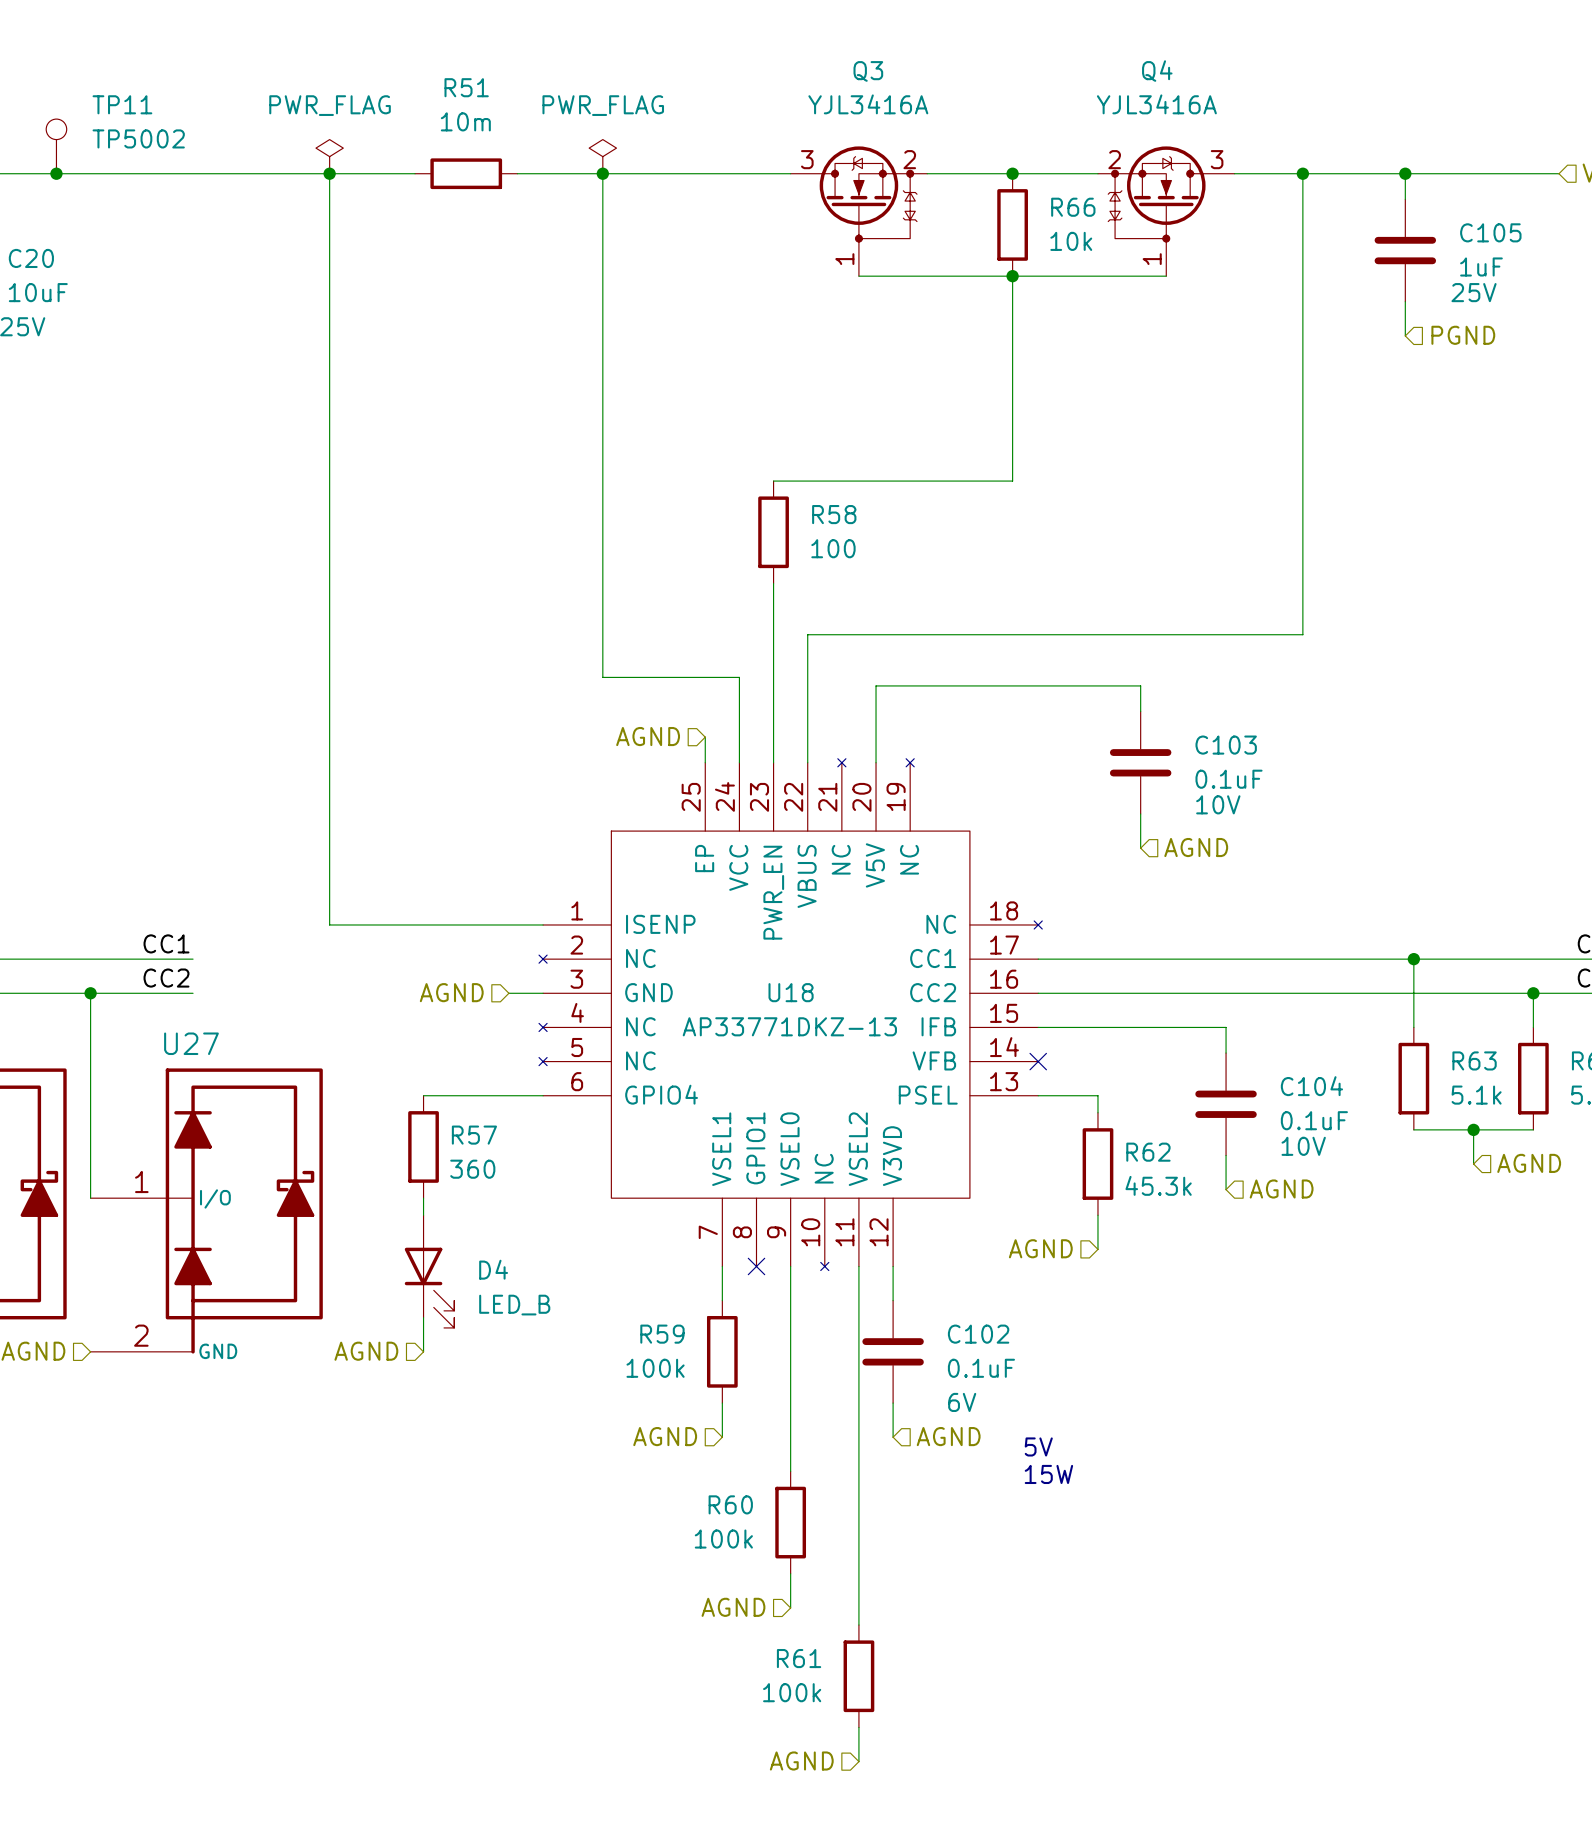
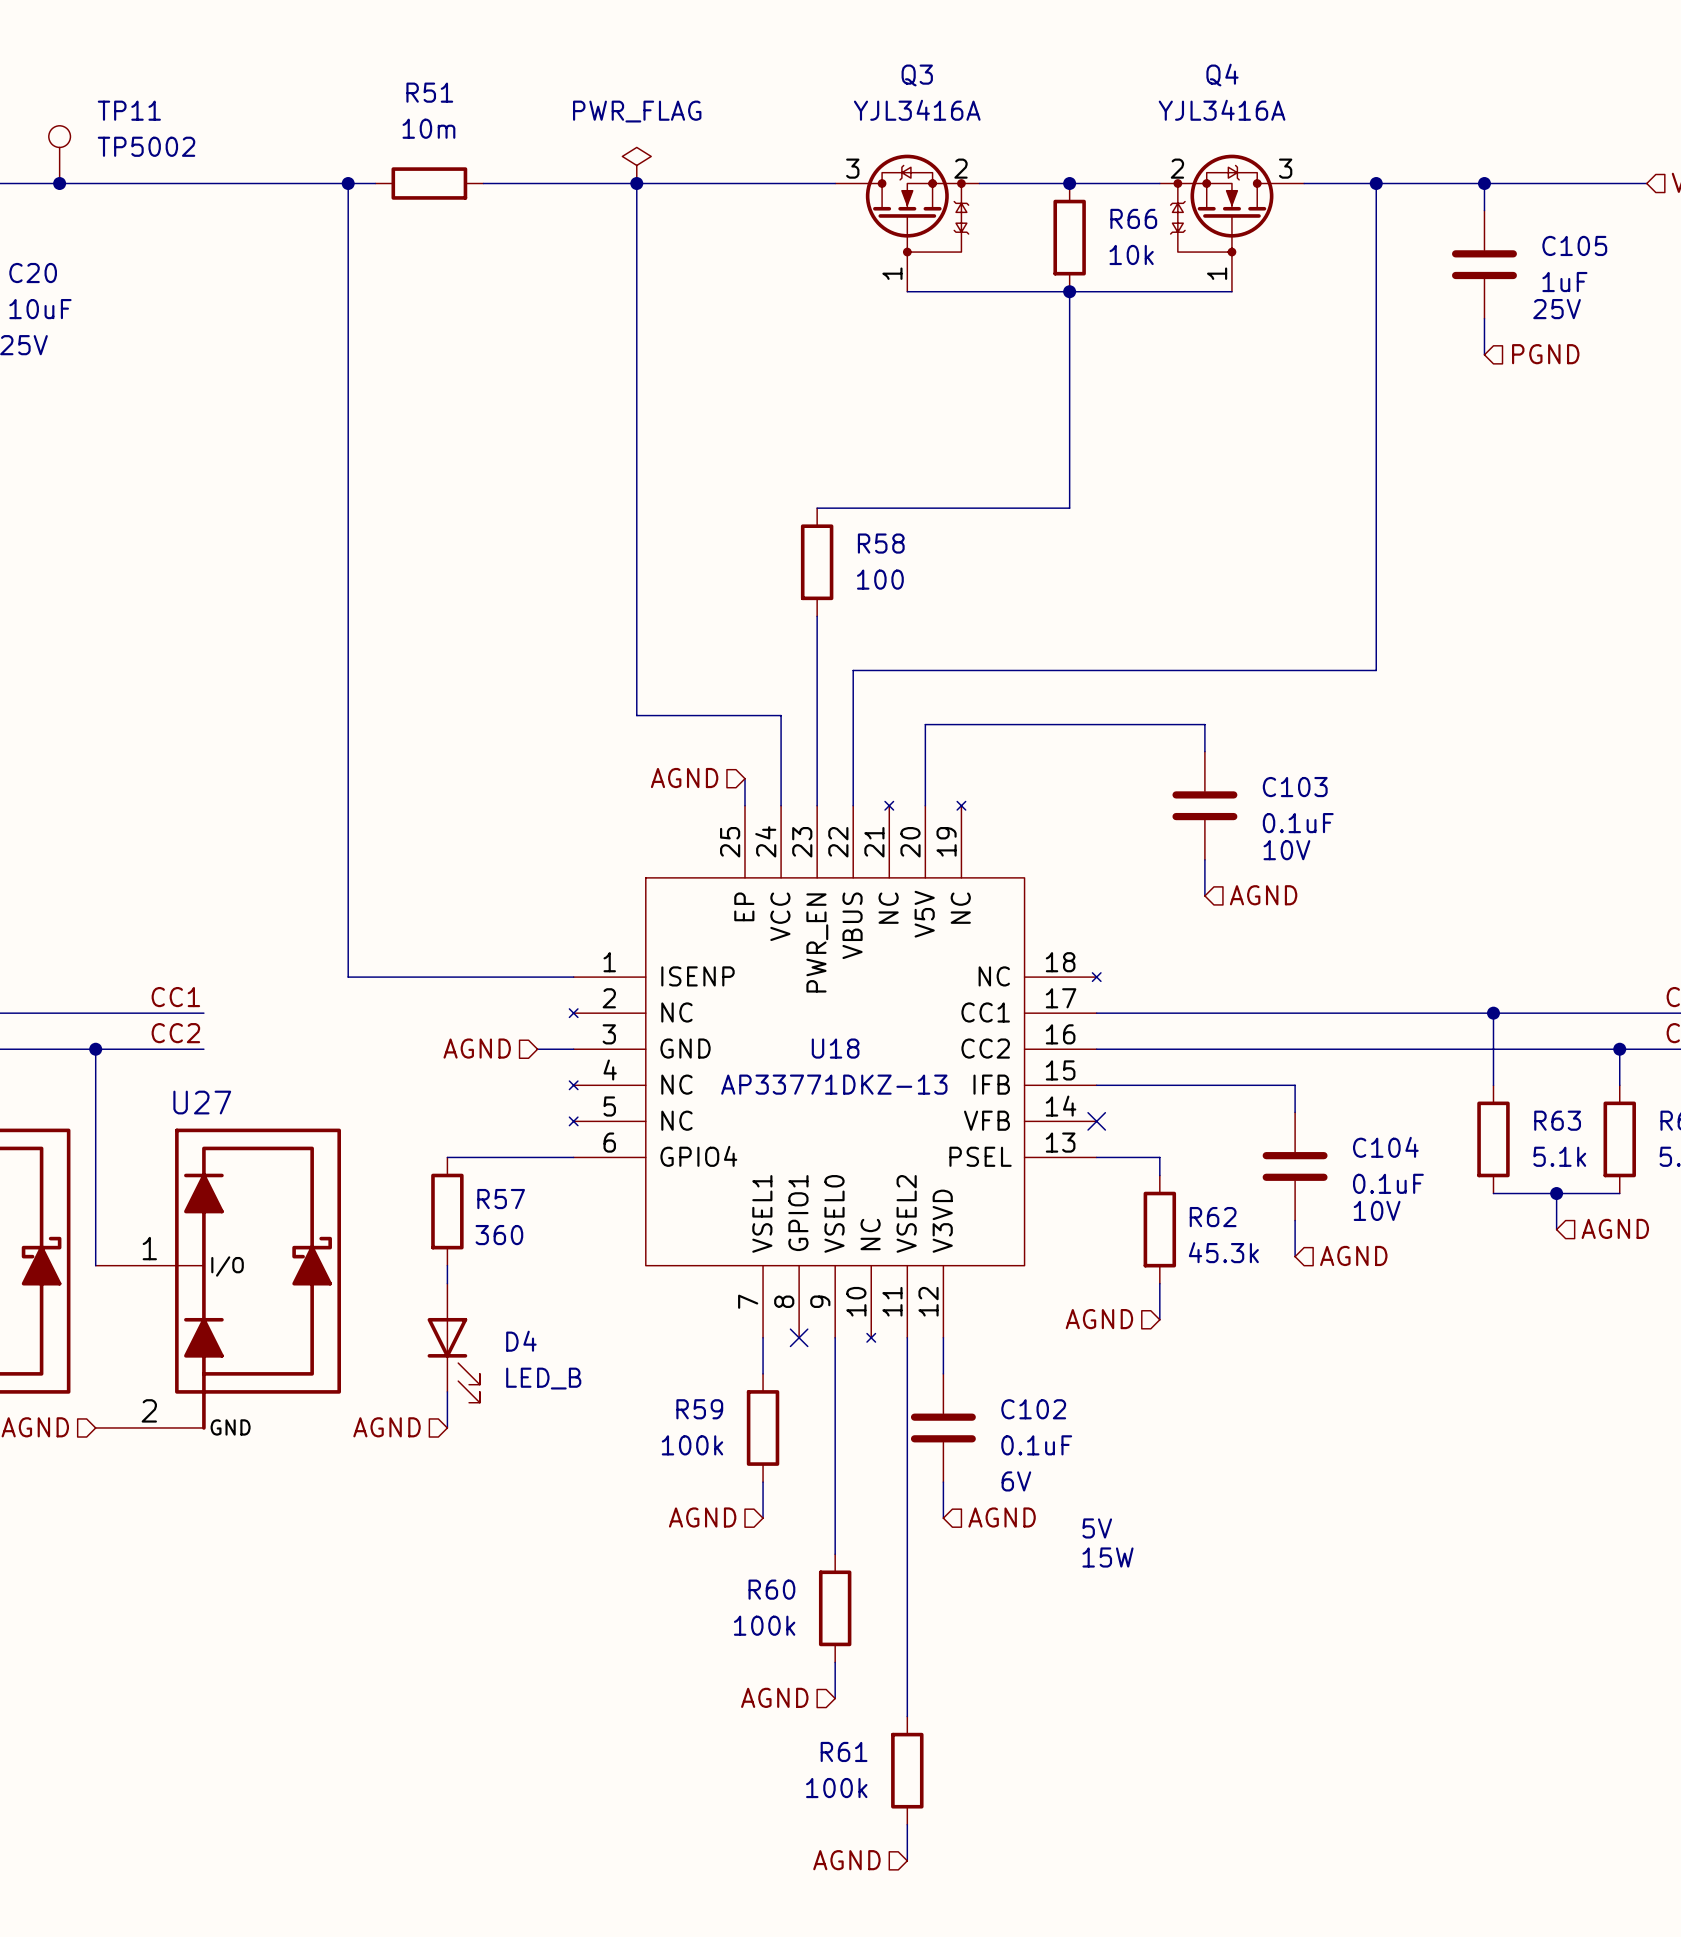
power symbol: PWR_FLAG (329, 156) -> none
wire: (355, 173) (415, 173) -> (483, 183) (546, 183)
R51 position: (466, 173) -> (429, 183)

